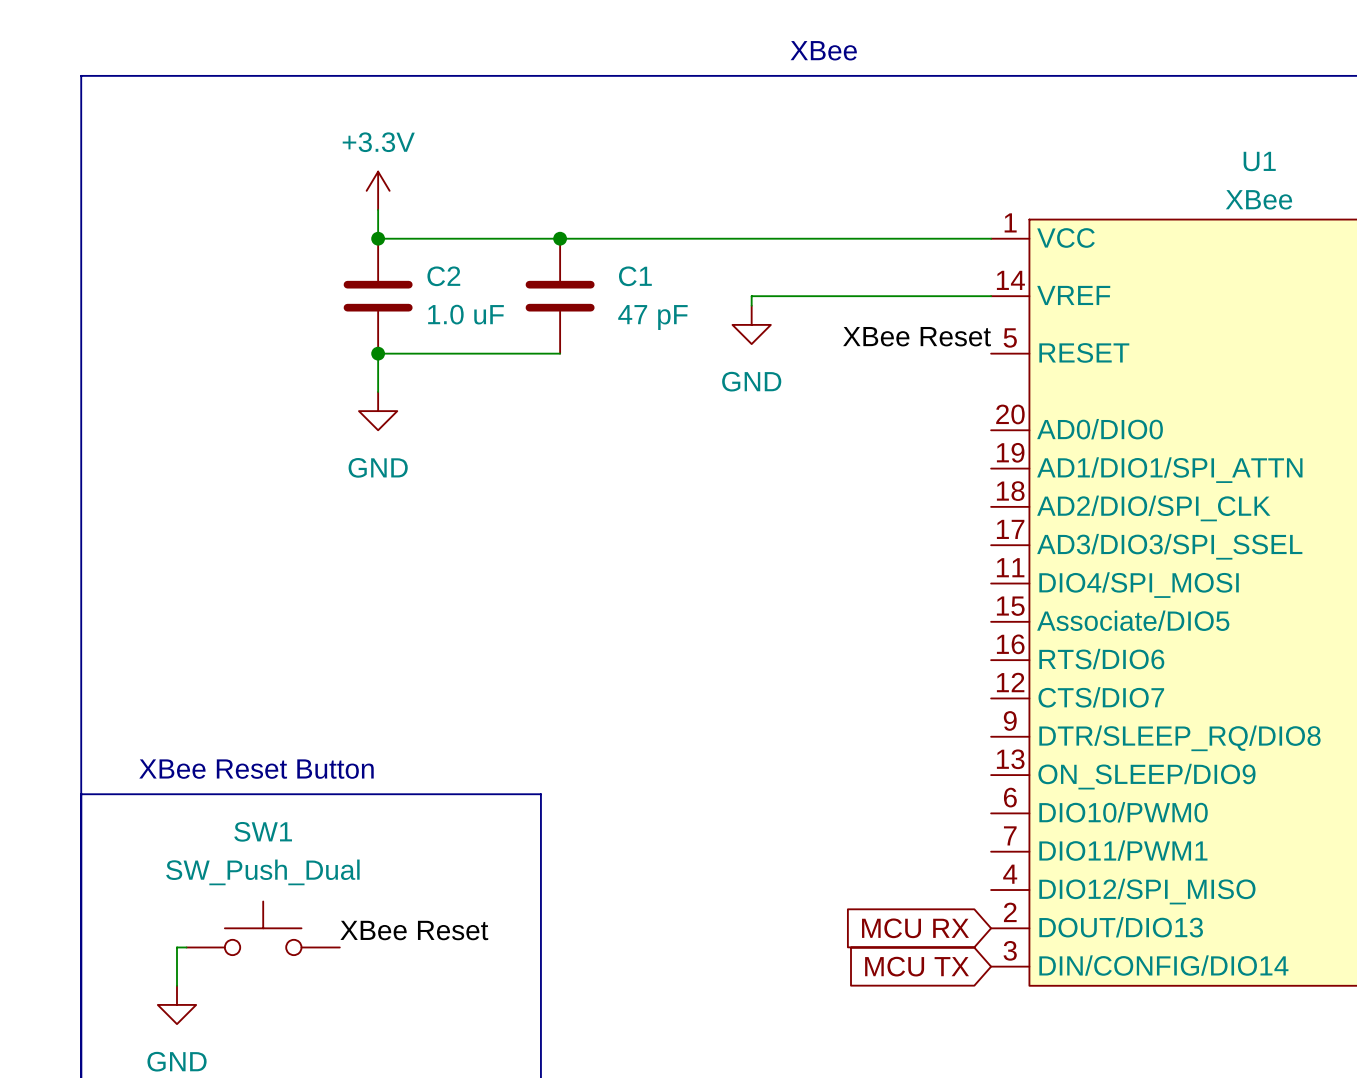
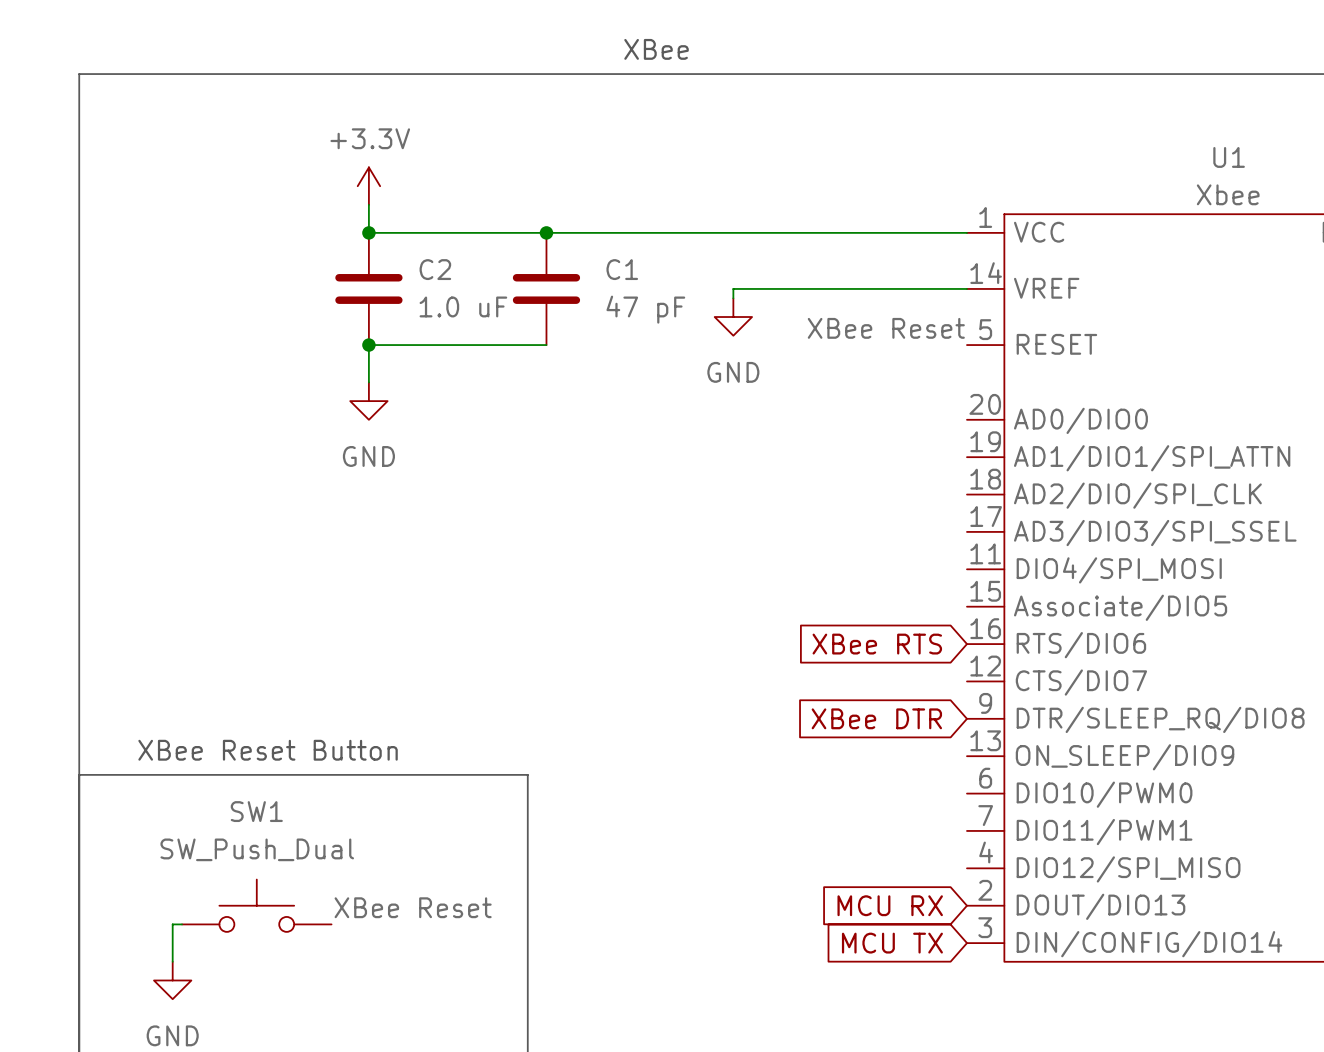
text position: XBee (823, 50) -> XBee (656, 49)
U1 value: XBee (1258, 199) -> Xbee (1228, 194)
global label: none -> XBee RTS (877, 644)
global label: none -> XBee DTR (876, 718)

